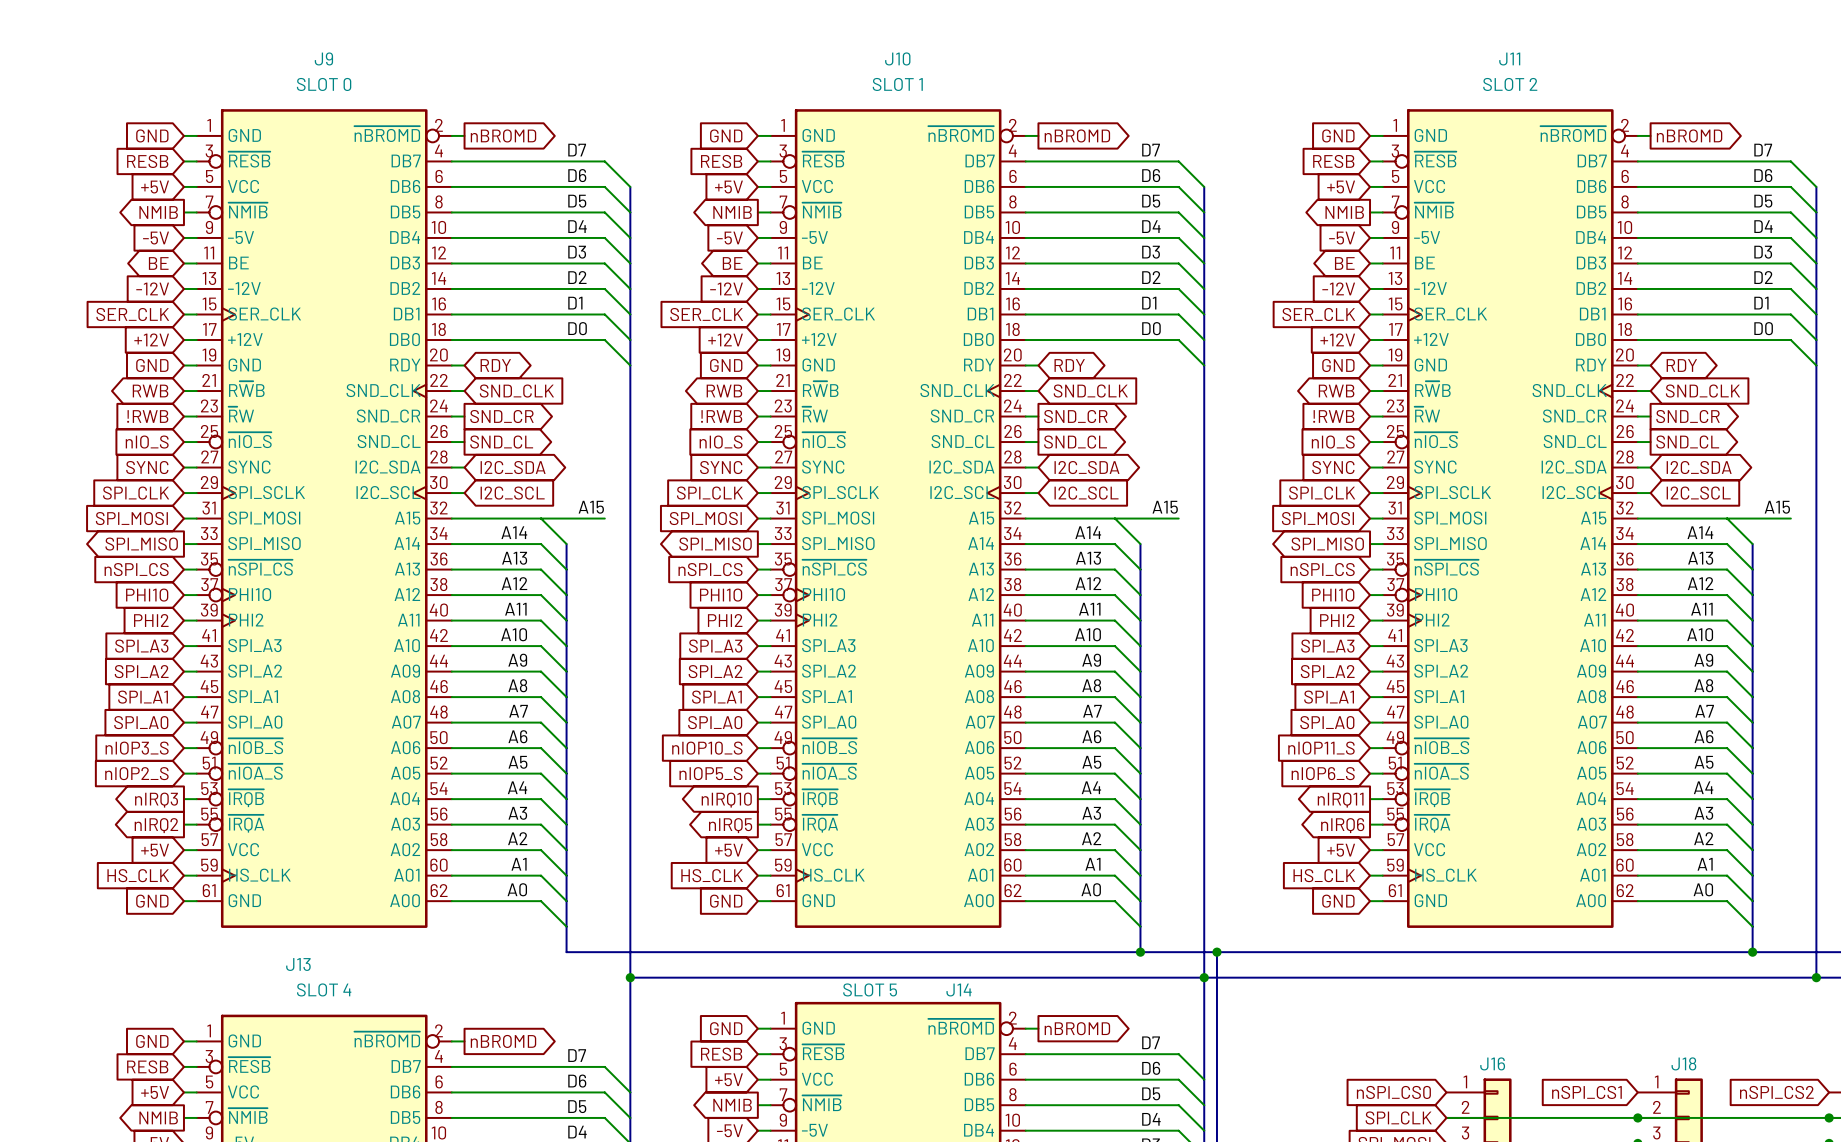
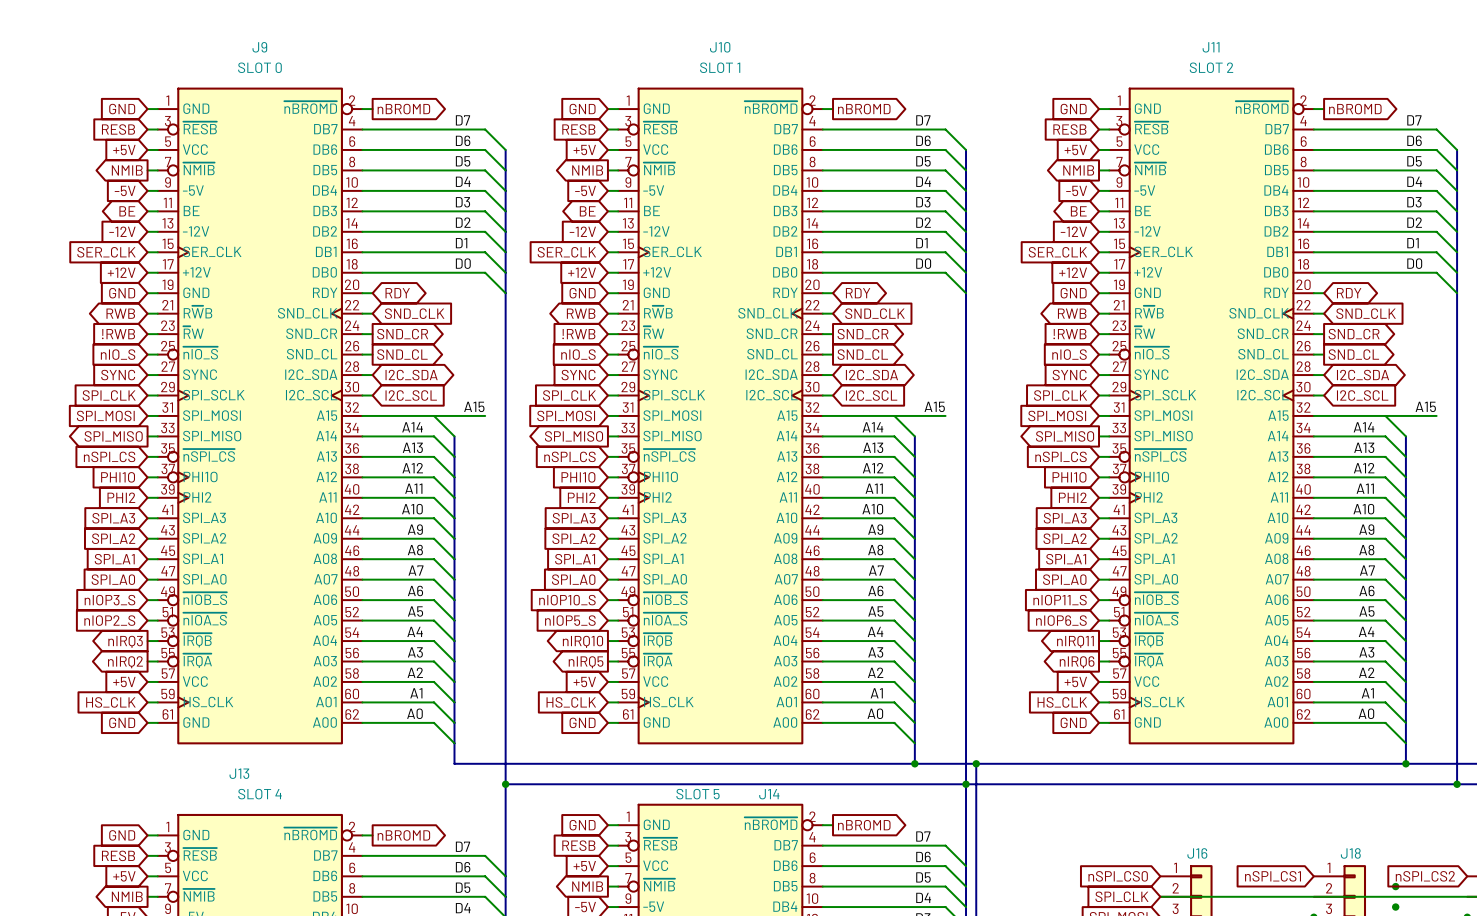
junction: none -> (1395, 886)
junction: (1637, 1117) -> none
junction: (1829, 1117) -> none
junction: none -> (1395, 907)

